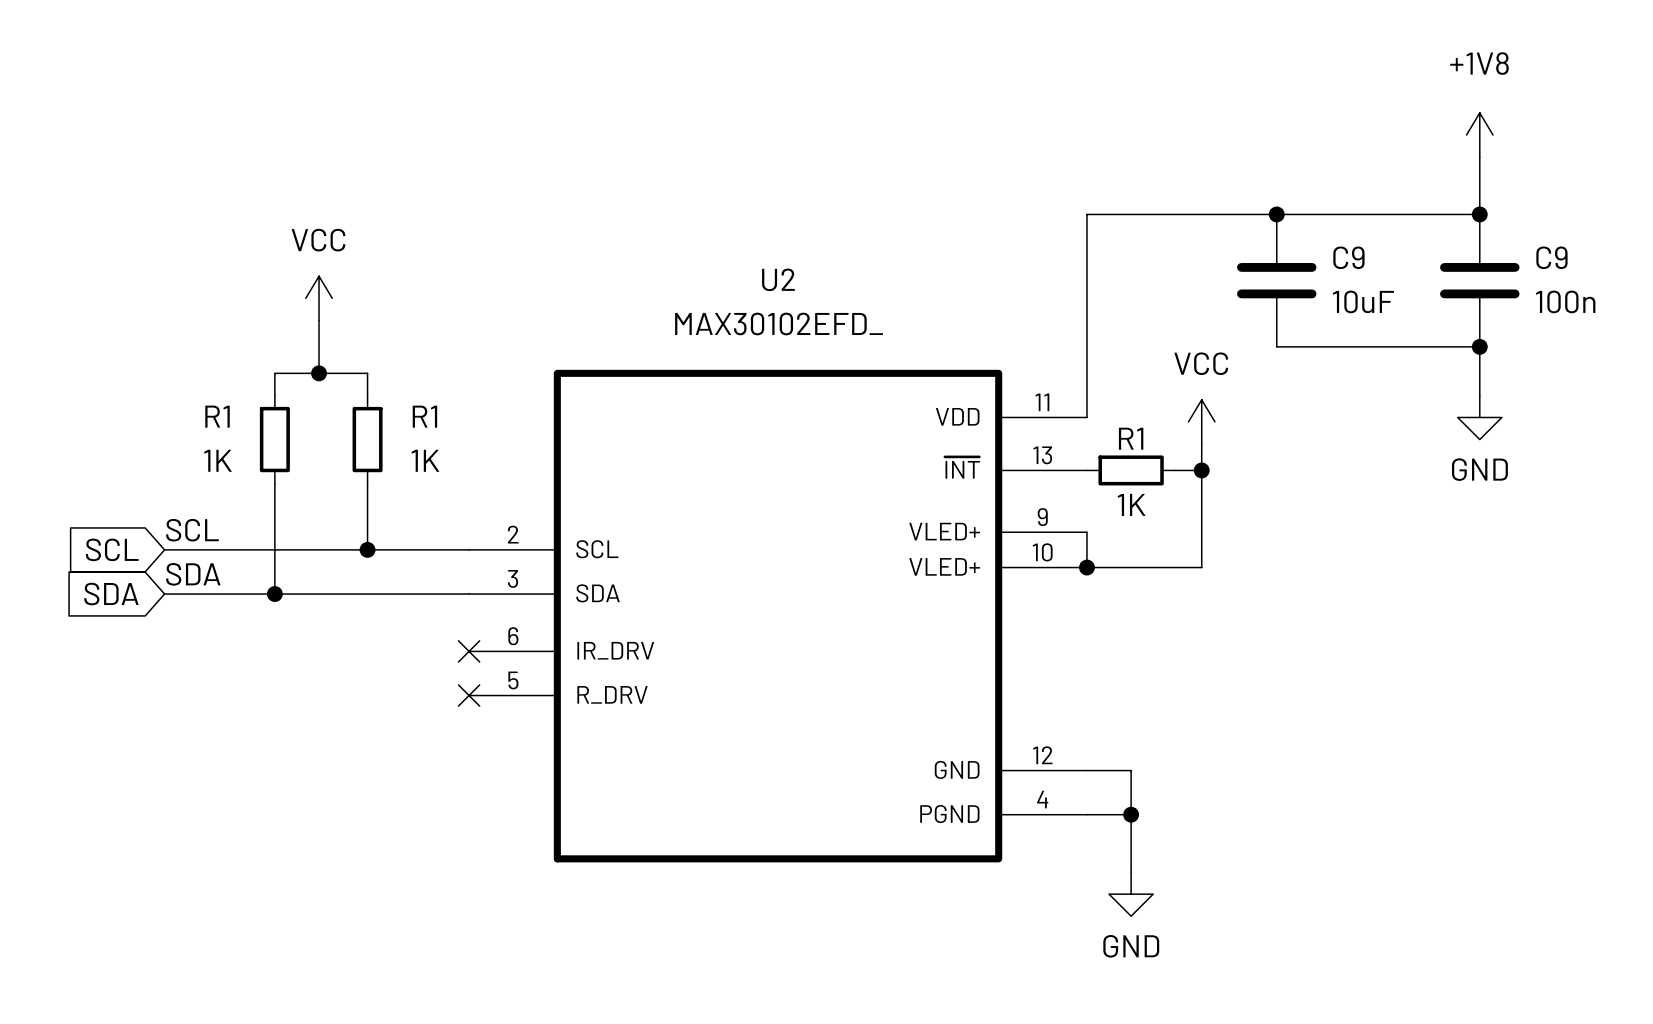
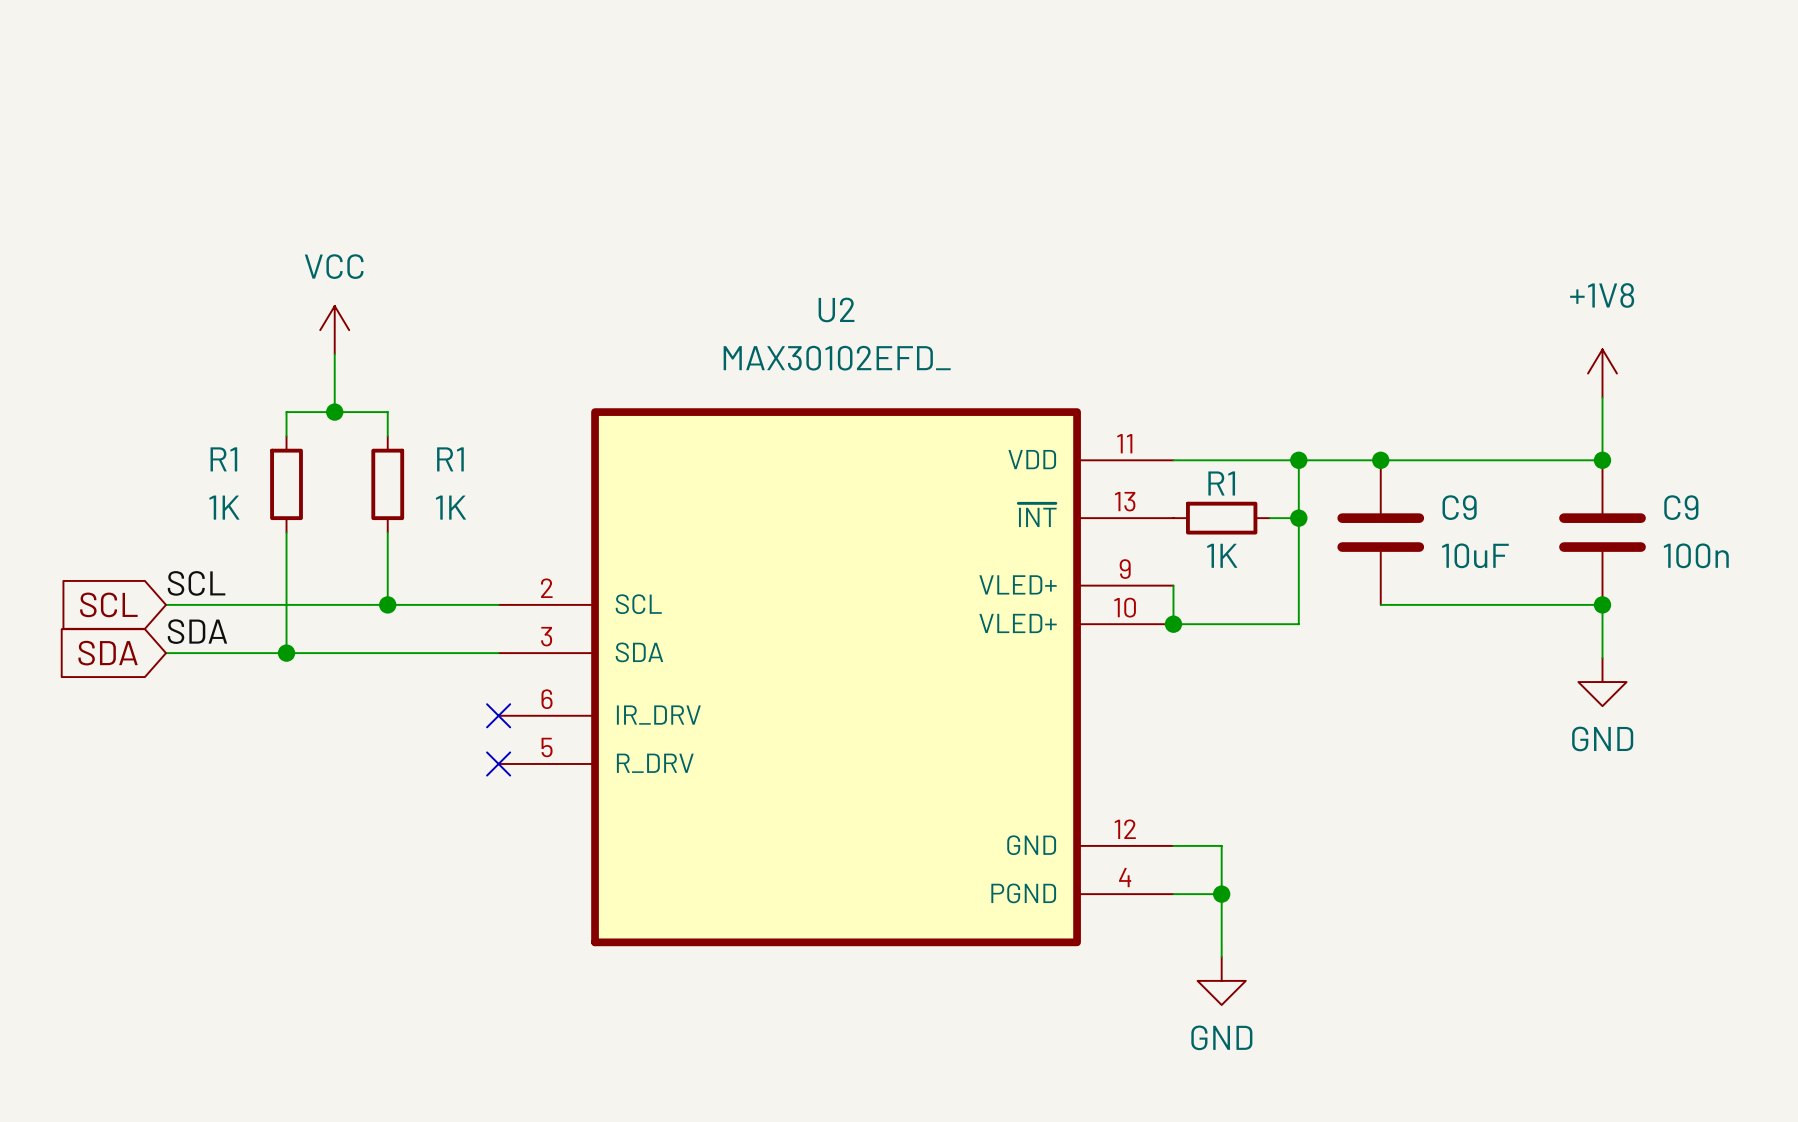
power symbol position: +1V8 (1479, 135) -> +1V8 (1602, 373)
wire: (1479, 157) (1479, 214) (1086, 214) (1086, 417) -> (1602, 436) (1602, 460) (1173, 460)
junction: (1276, 214) -> none
junction: (1479, 214) -> none
C9 position: (1276, 280) -> (1380, 532)
C9 position: (1479, 280) -> (1602, 532)
wire: (1276, 346) (1479, 346) (1479, 360) -> none
junction position: (1479, 346) -> (1602, 460)
junction: none -> (1298, 460)
junction: none -> (1380, 460)
power symbol position: GND (1479, 417) -> GND (1602, 682)
power symbol: VCC (1201, 421) -> none
wire: none -> (1380, 604) (1602, 604) (1602, 657)
junction: none -> (1602, 604)

